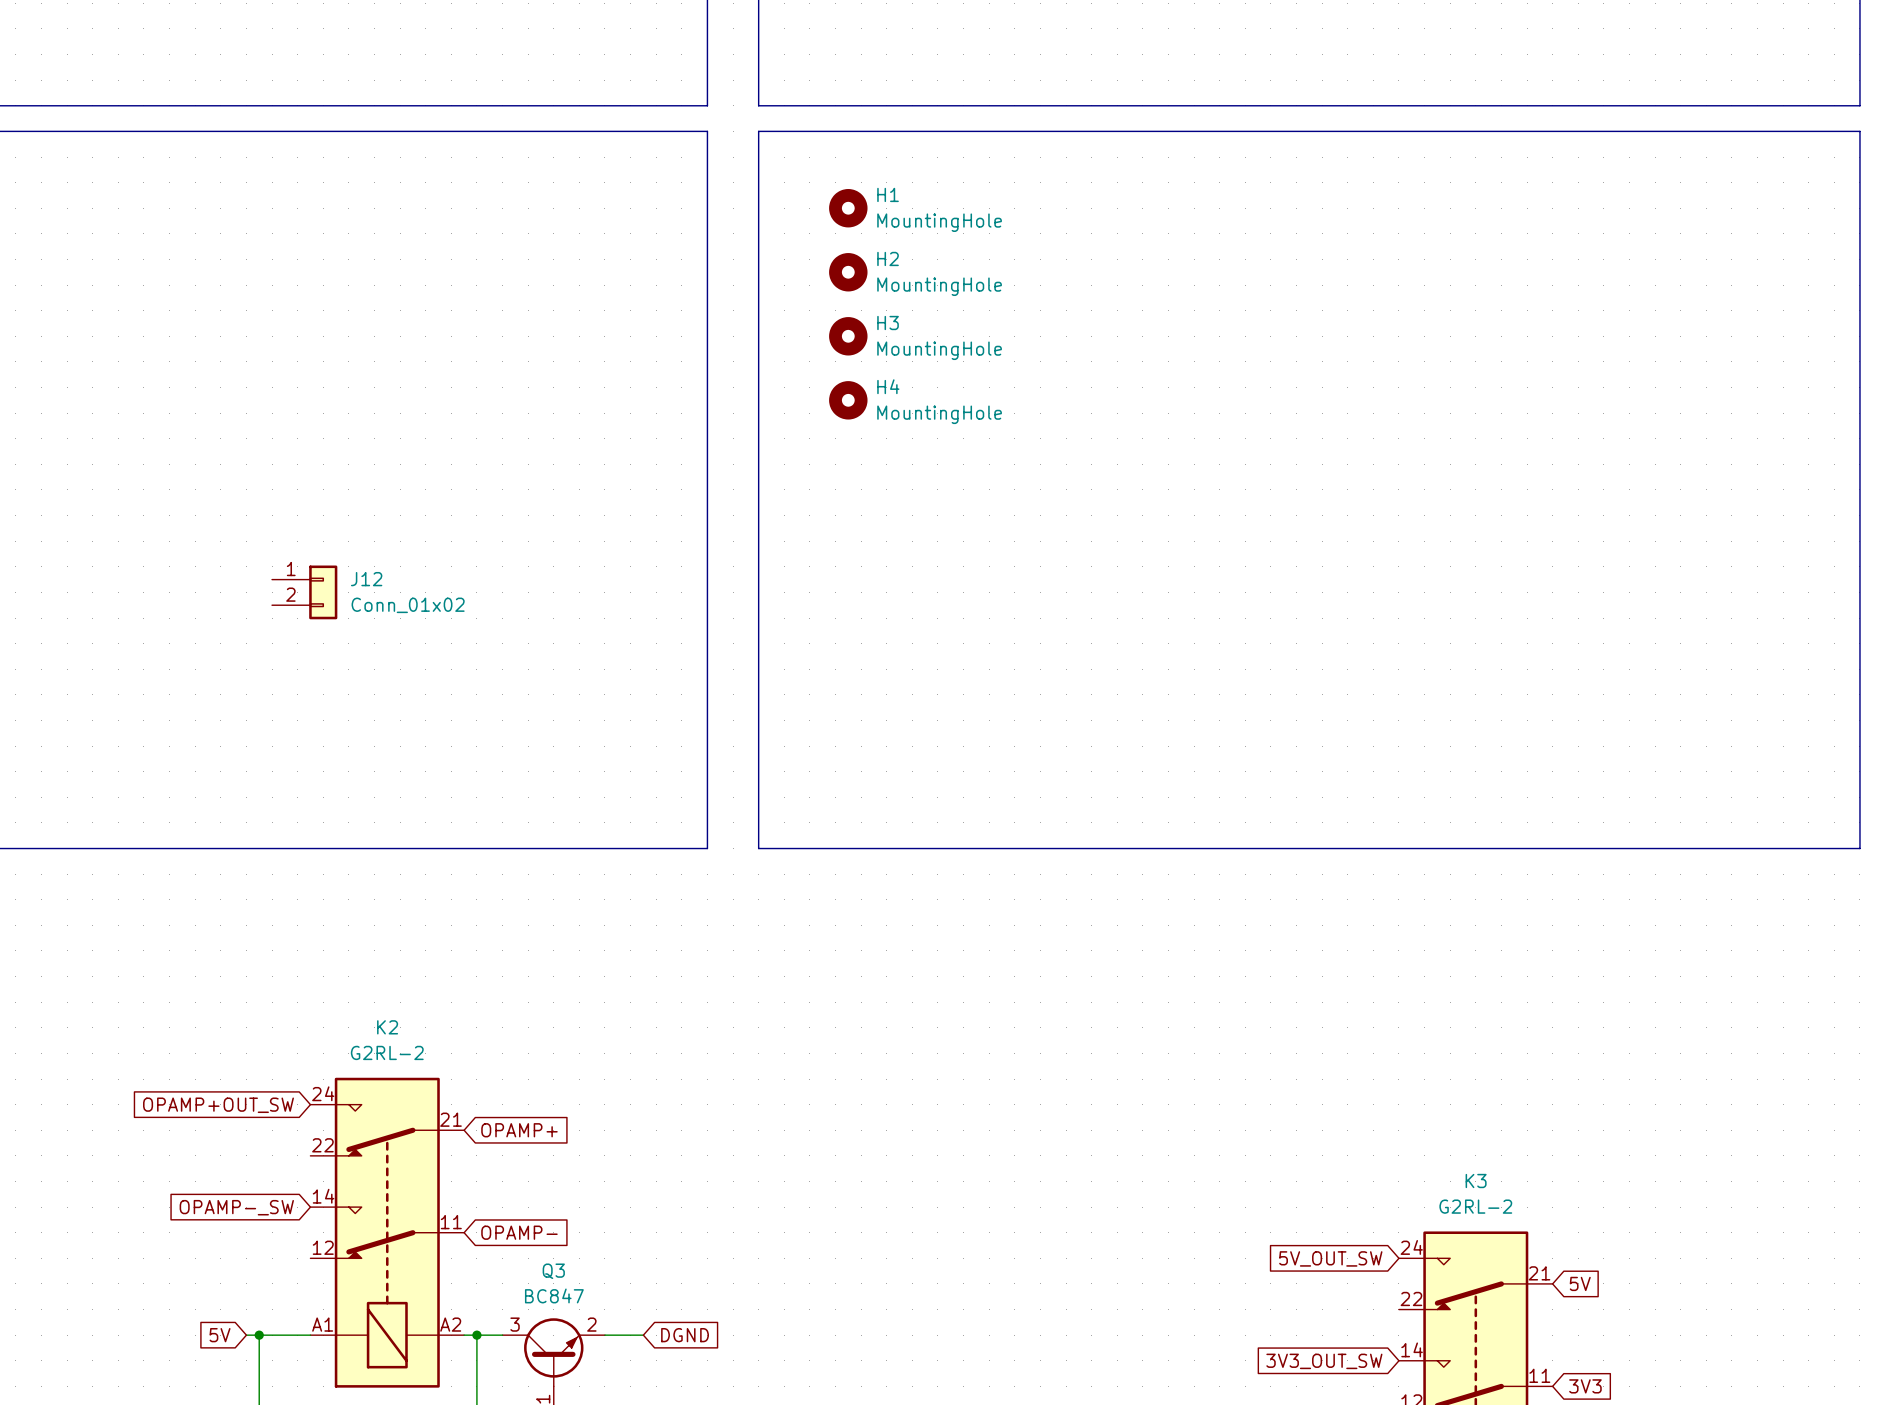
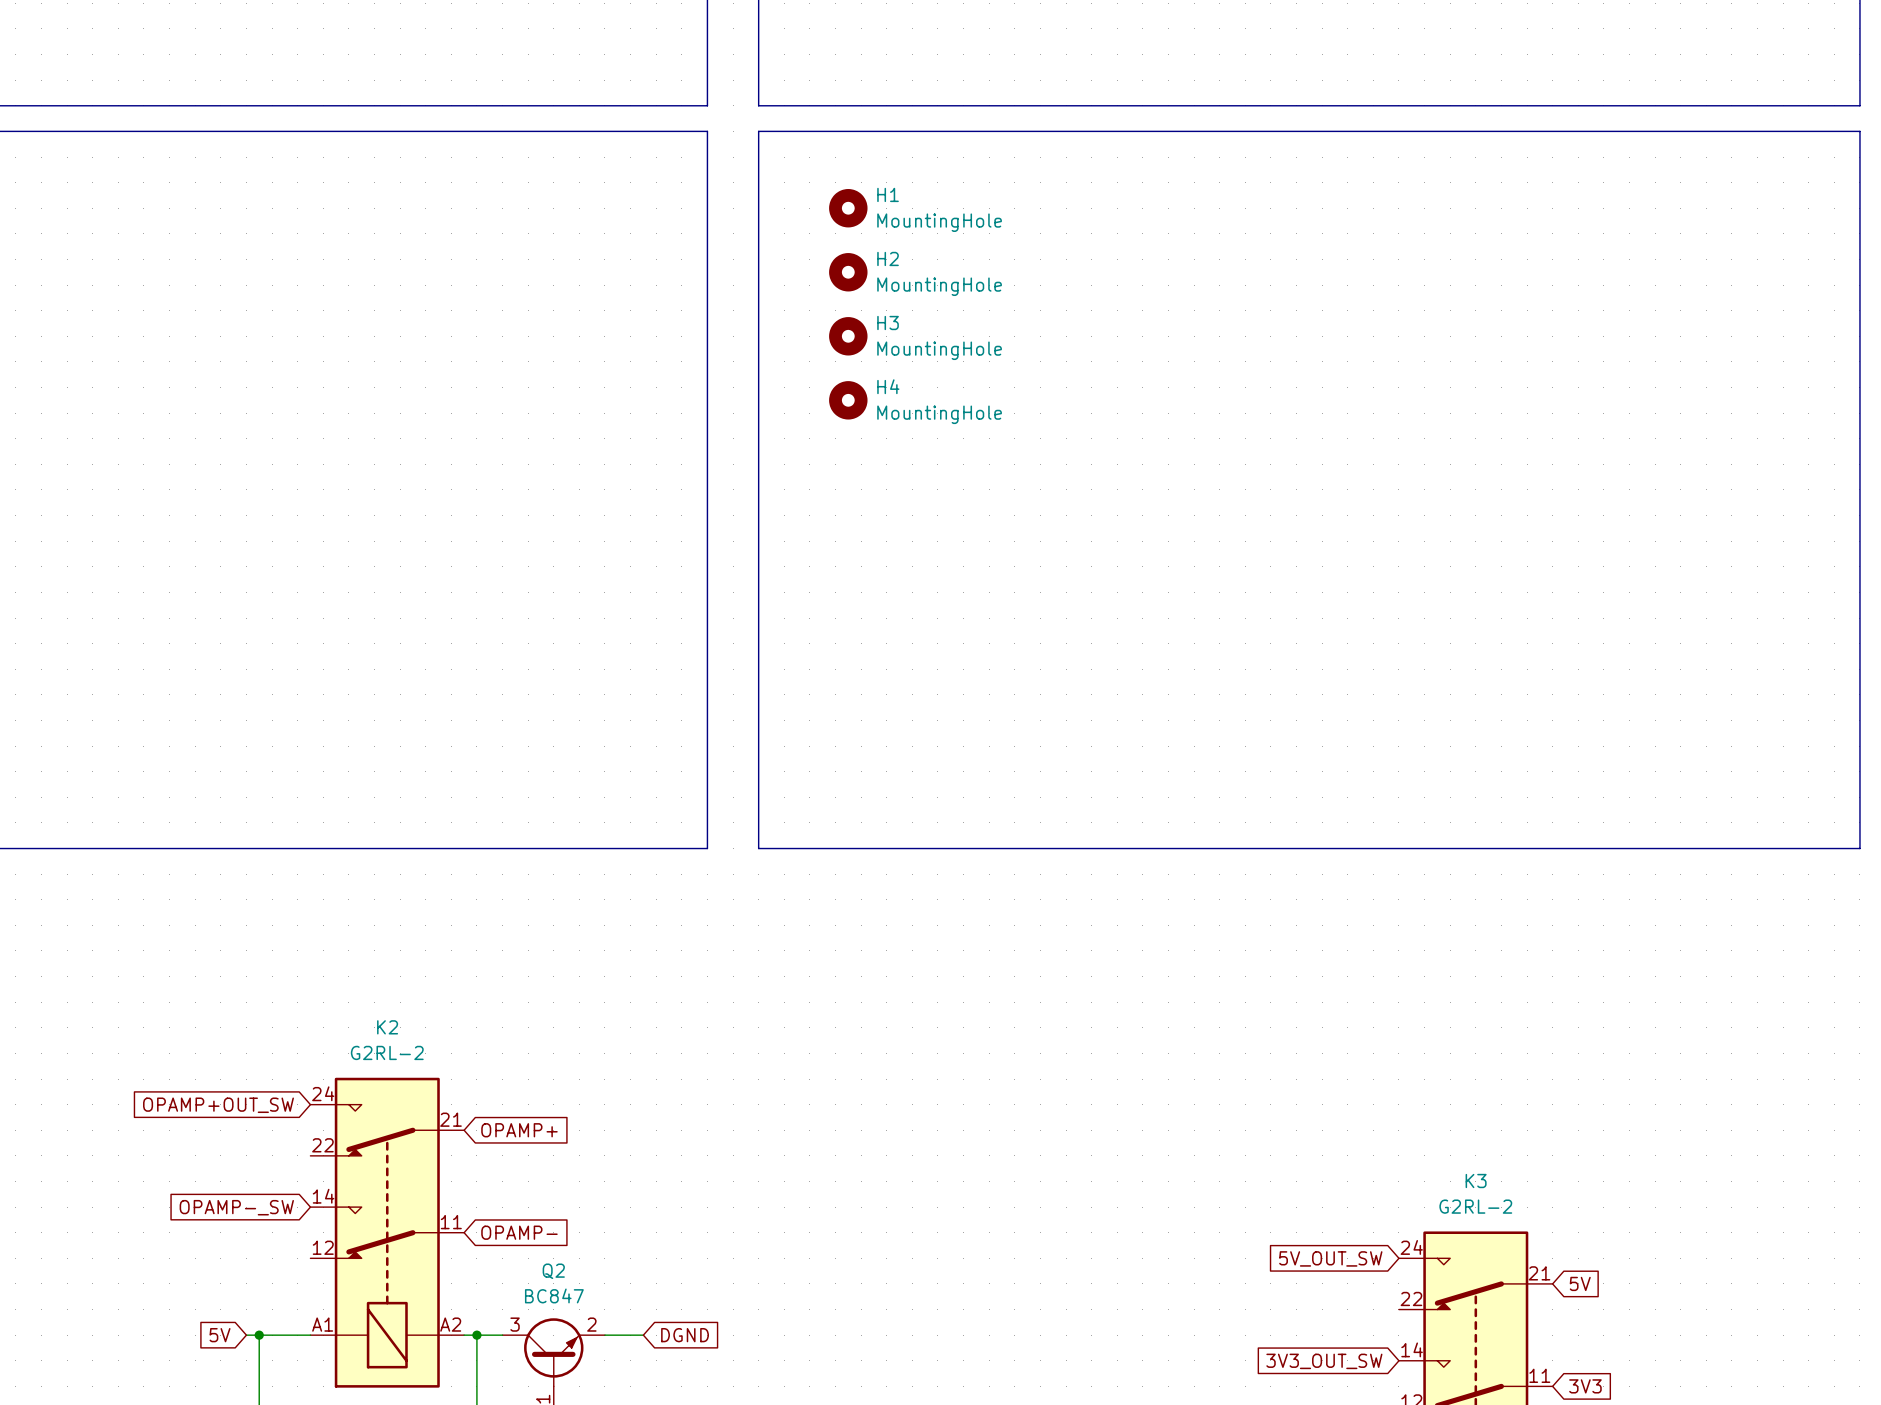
J12: Conn_01x02 (304, 592) -> none
Q3 name: Q3 (553, 1271) -> Q2 (553, 1271)

